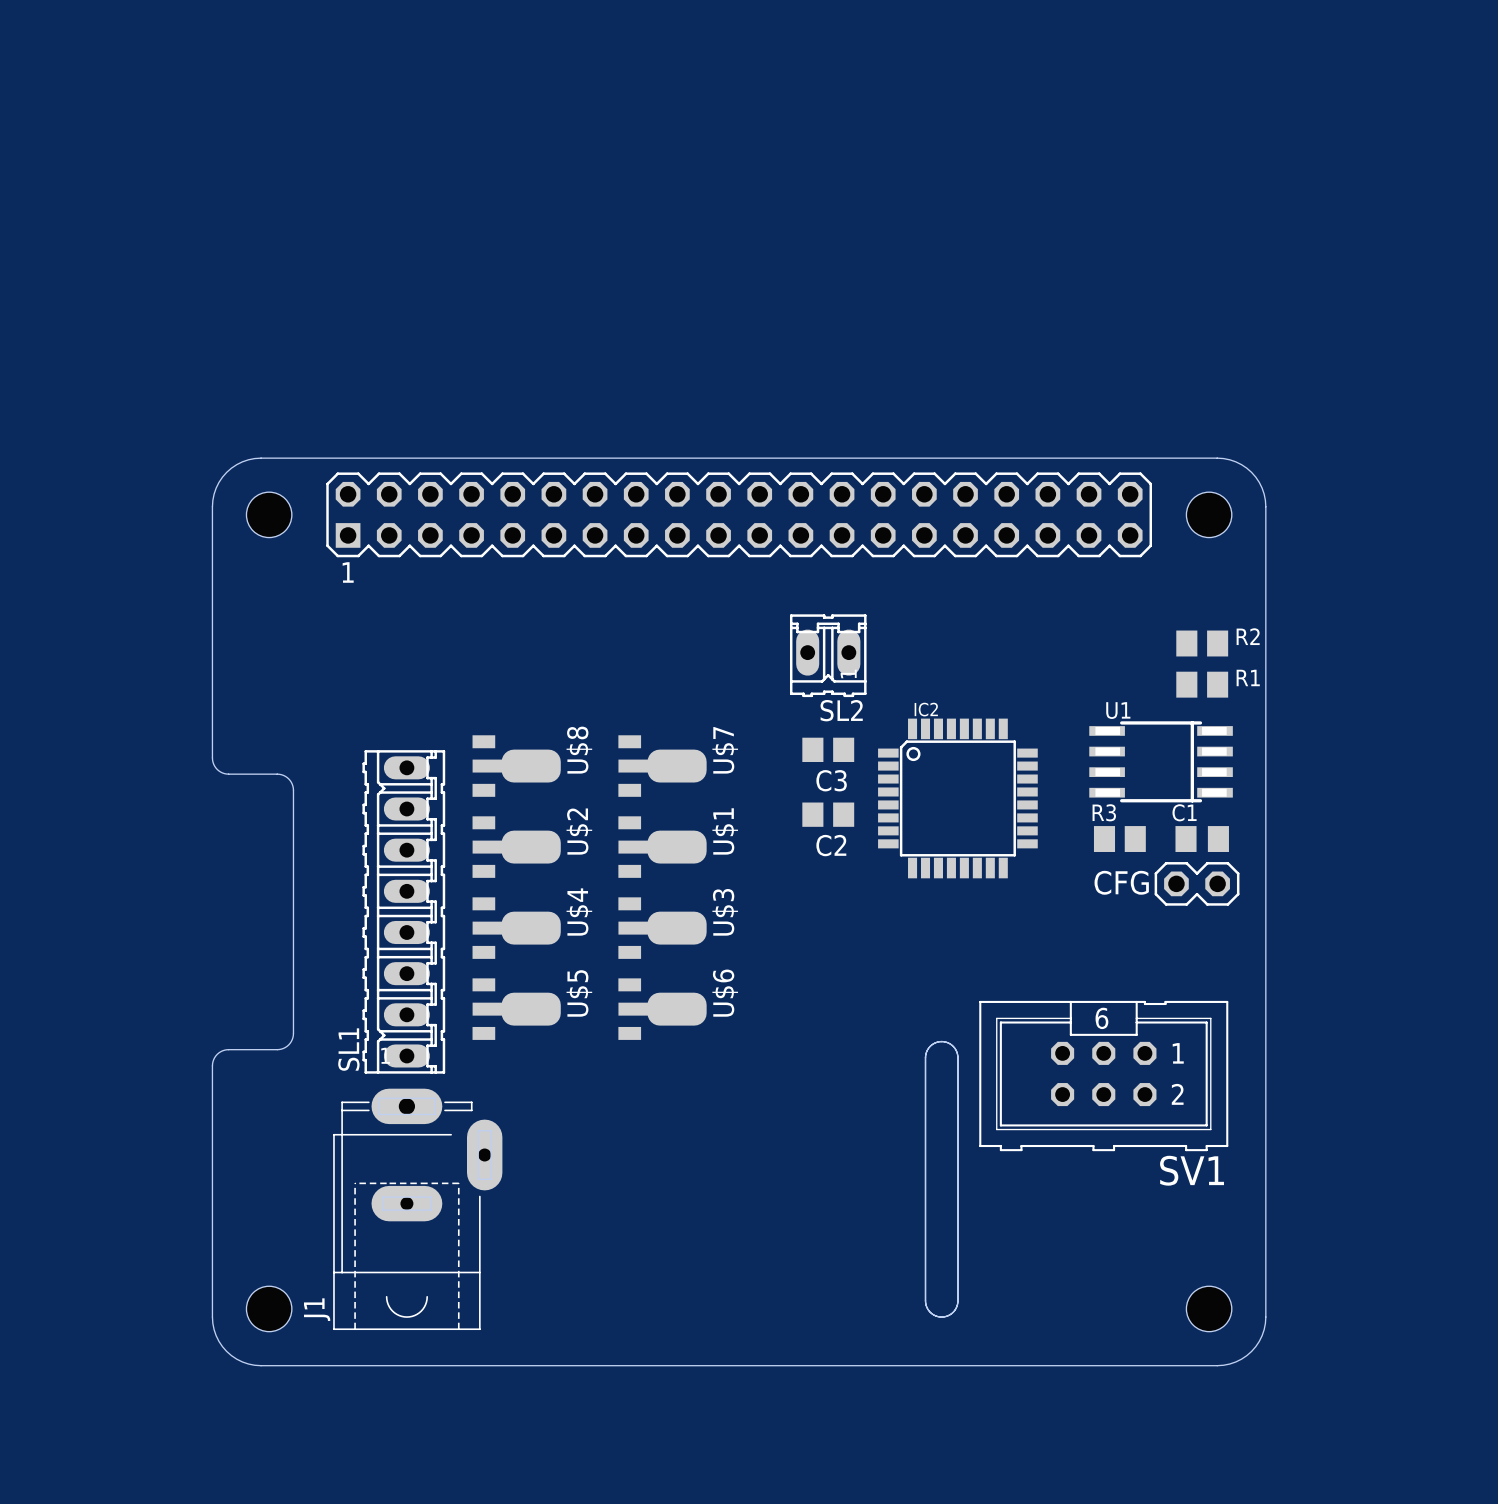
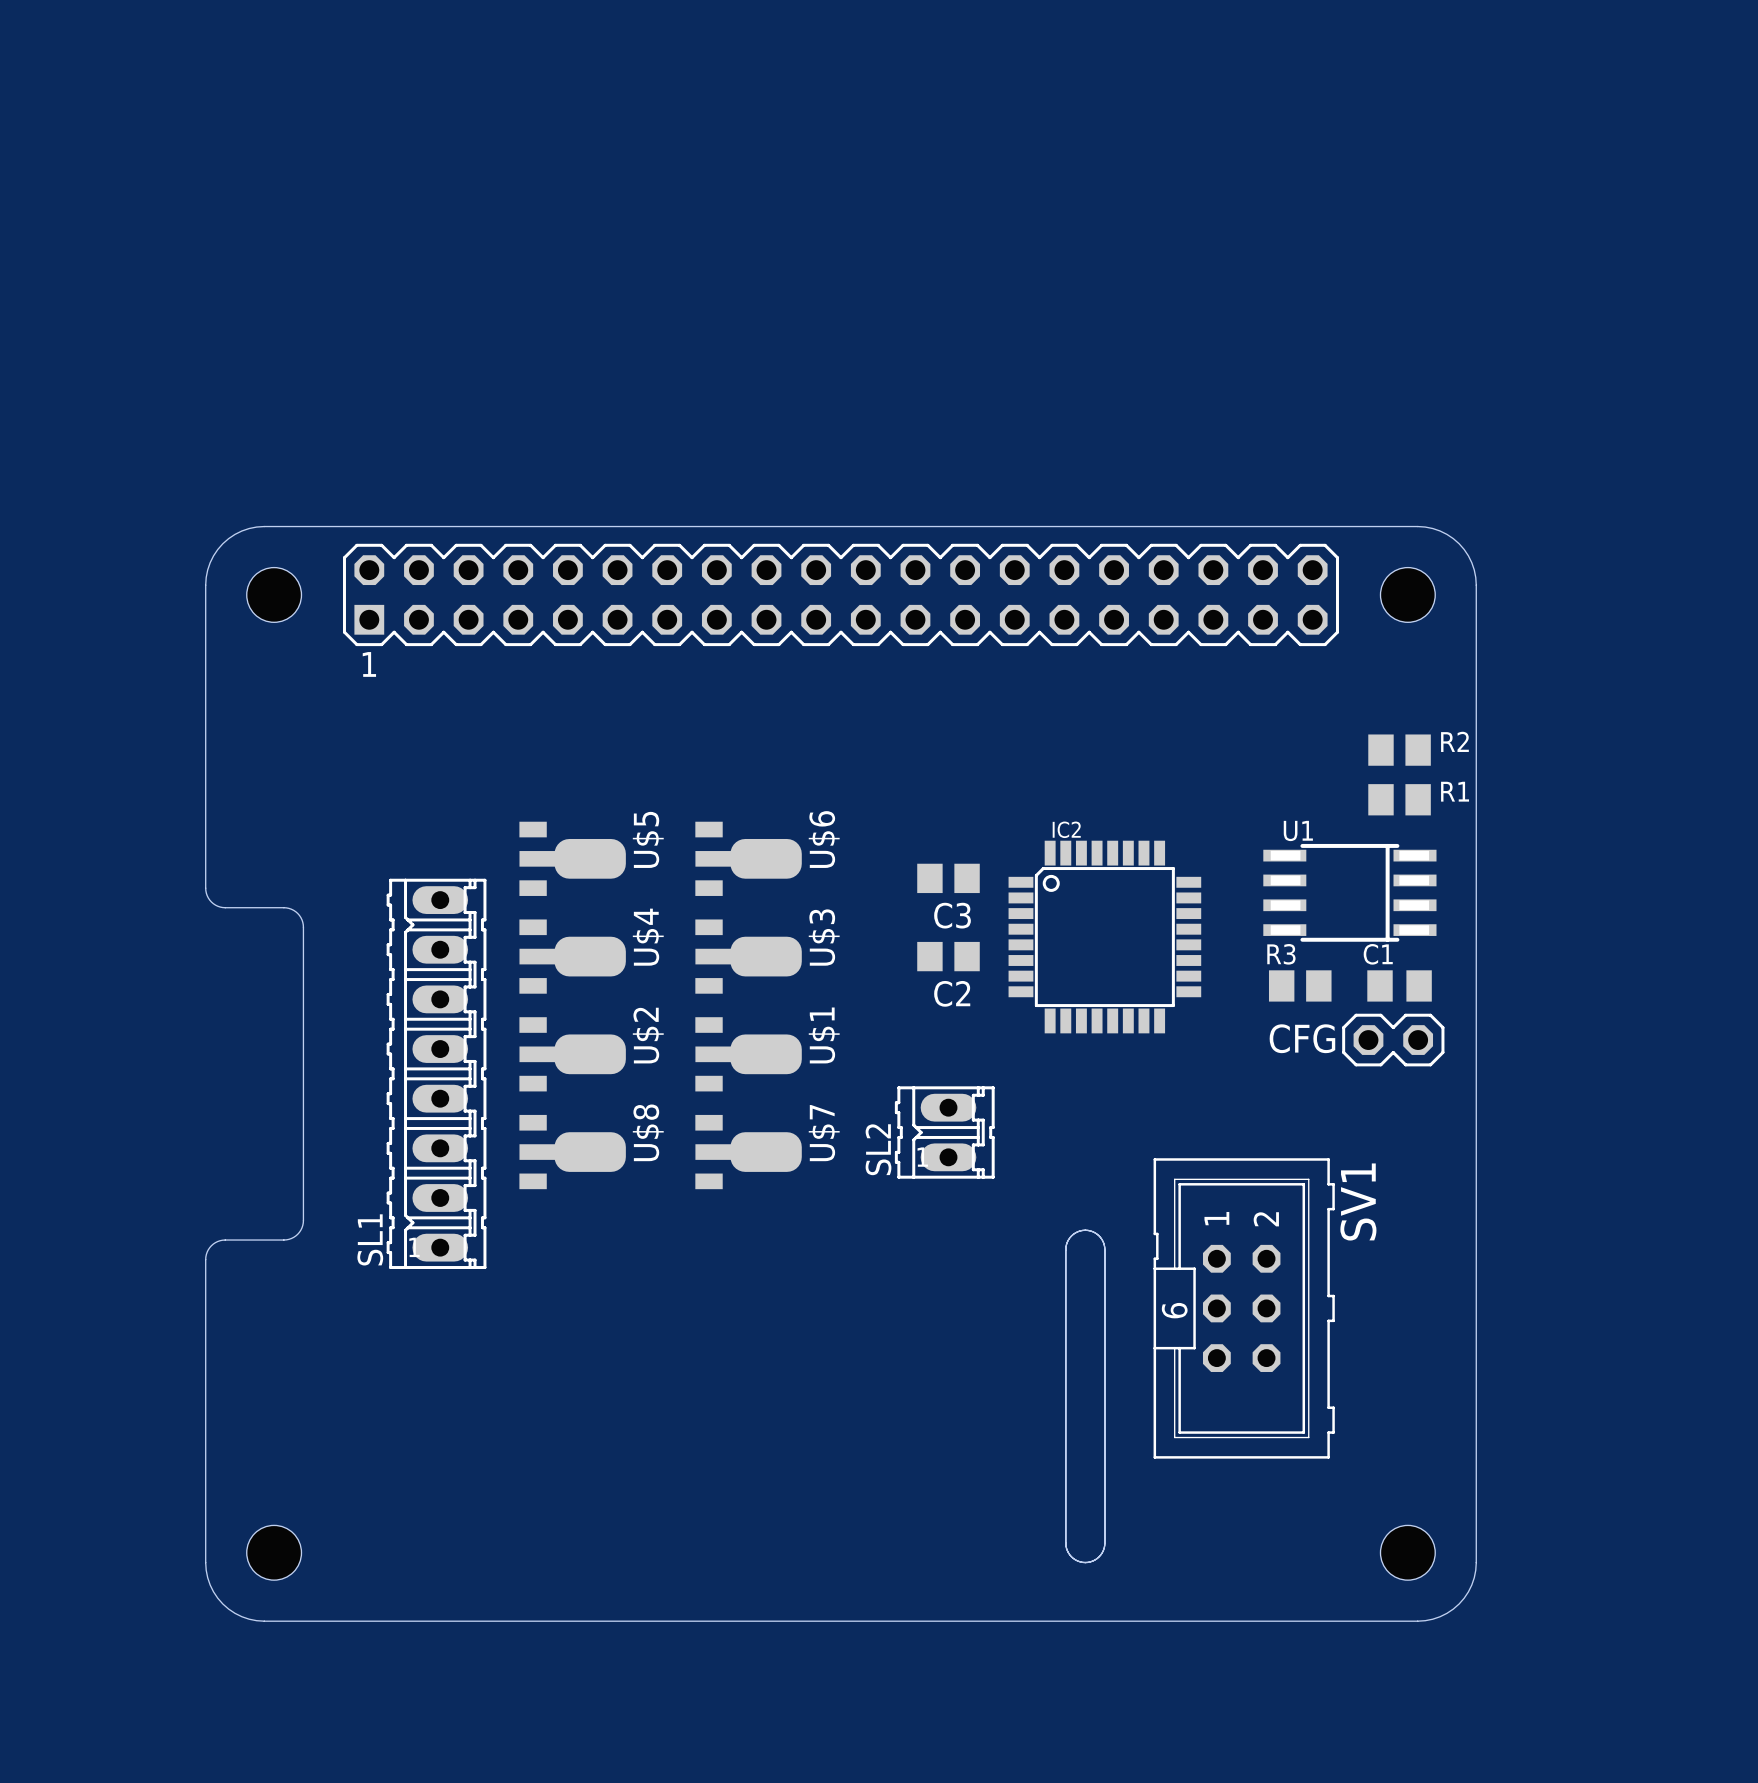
SL2 rotation: 0° (828, 655) -> 90° clockwise (944, 1132)
SL2 position: (828, 655) -> (944, 1132)
U$8 position: (516, 766) -> (572, 1152)
U$7 position: (662, 766) -> (748, 1152)
U$2 position: (516, 847) -> (572, 1054)
U$1 position: (662, 847) -> (748, 1054)
U$4 position: (516, 928) -> (572, 956)
U$3 position: (662, 928) -> (748, 956)
U$5 position: (516, 1009) -> (572, 858)
U$6 position: (662, 1009) -> (748, 858)
SV1 rotation: 0° (1103, 1076) -> 90° counterclockwise (1244, 1308)
J1: (417, 1209) -> none

